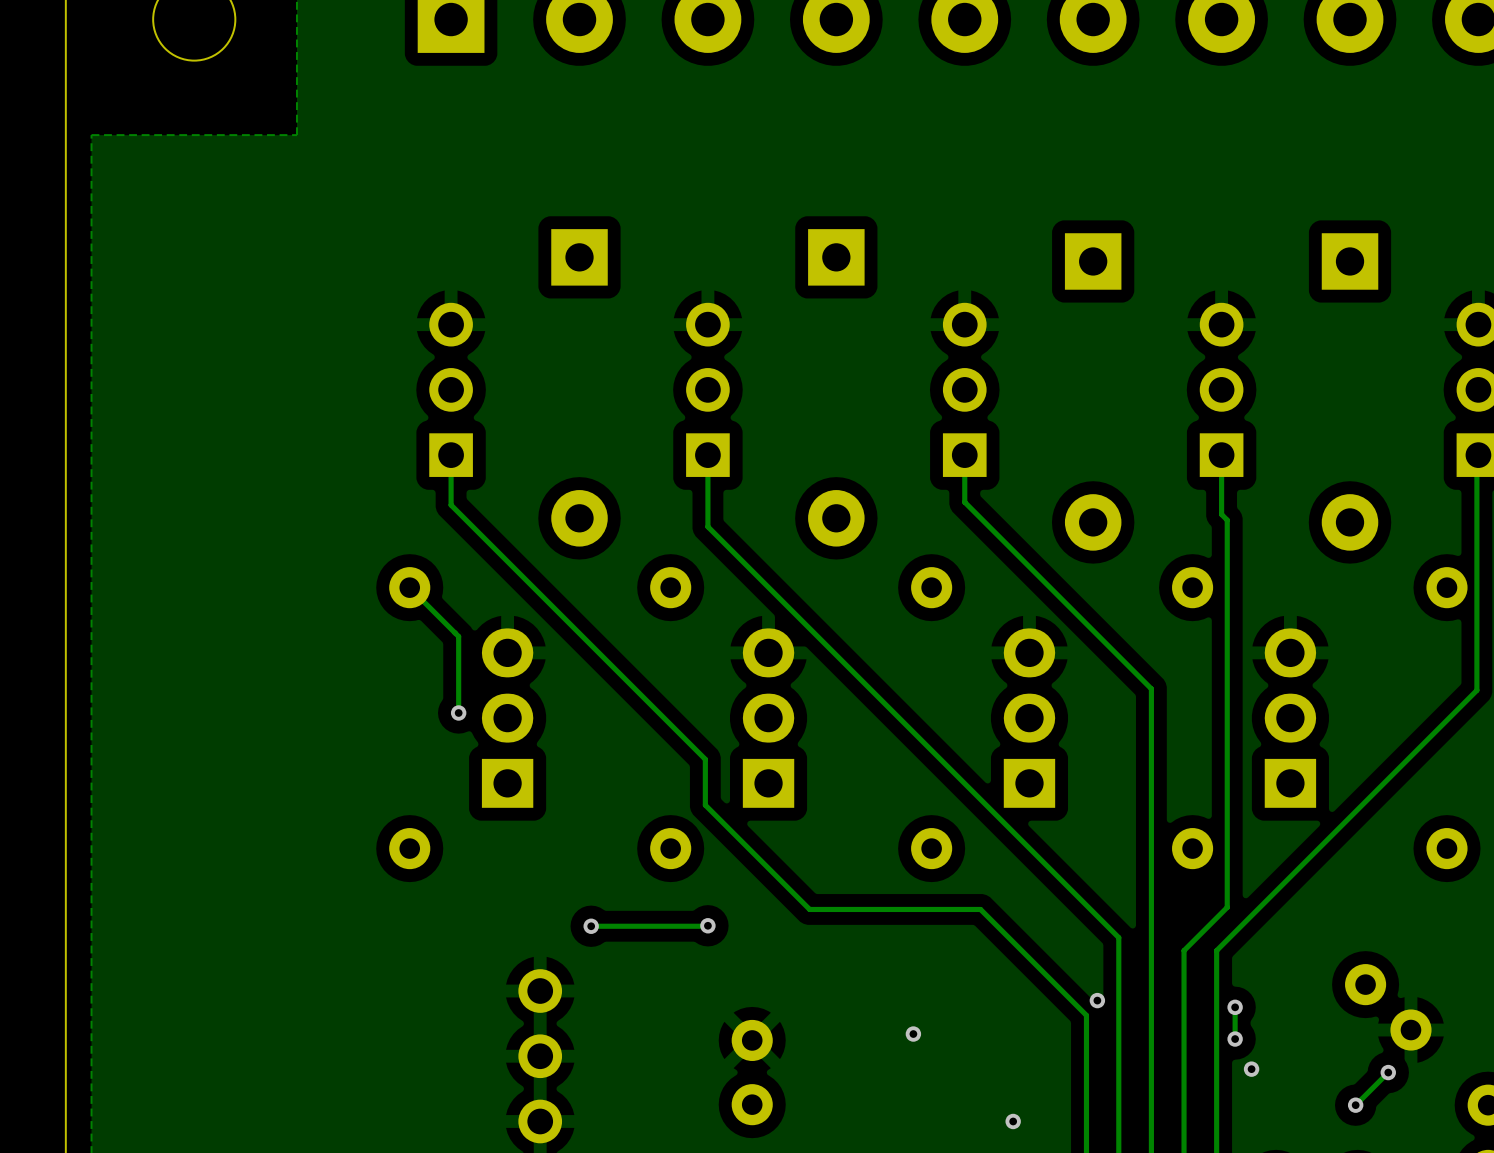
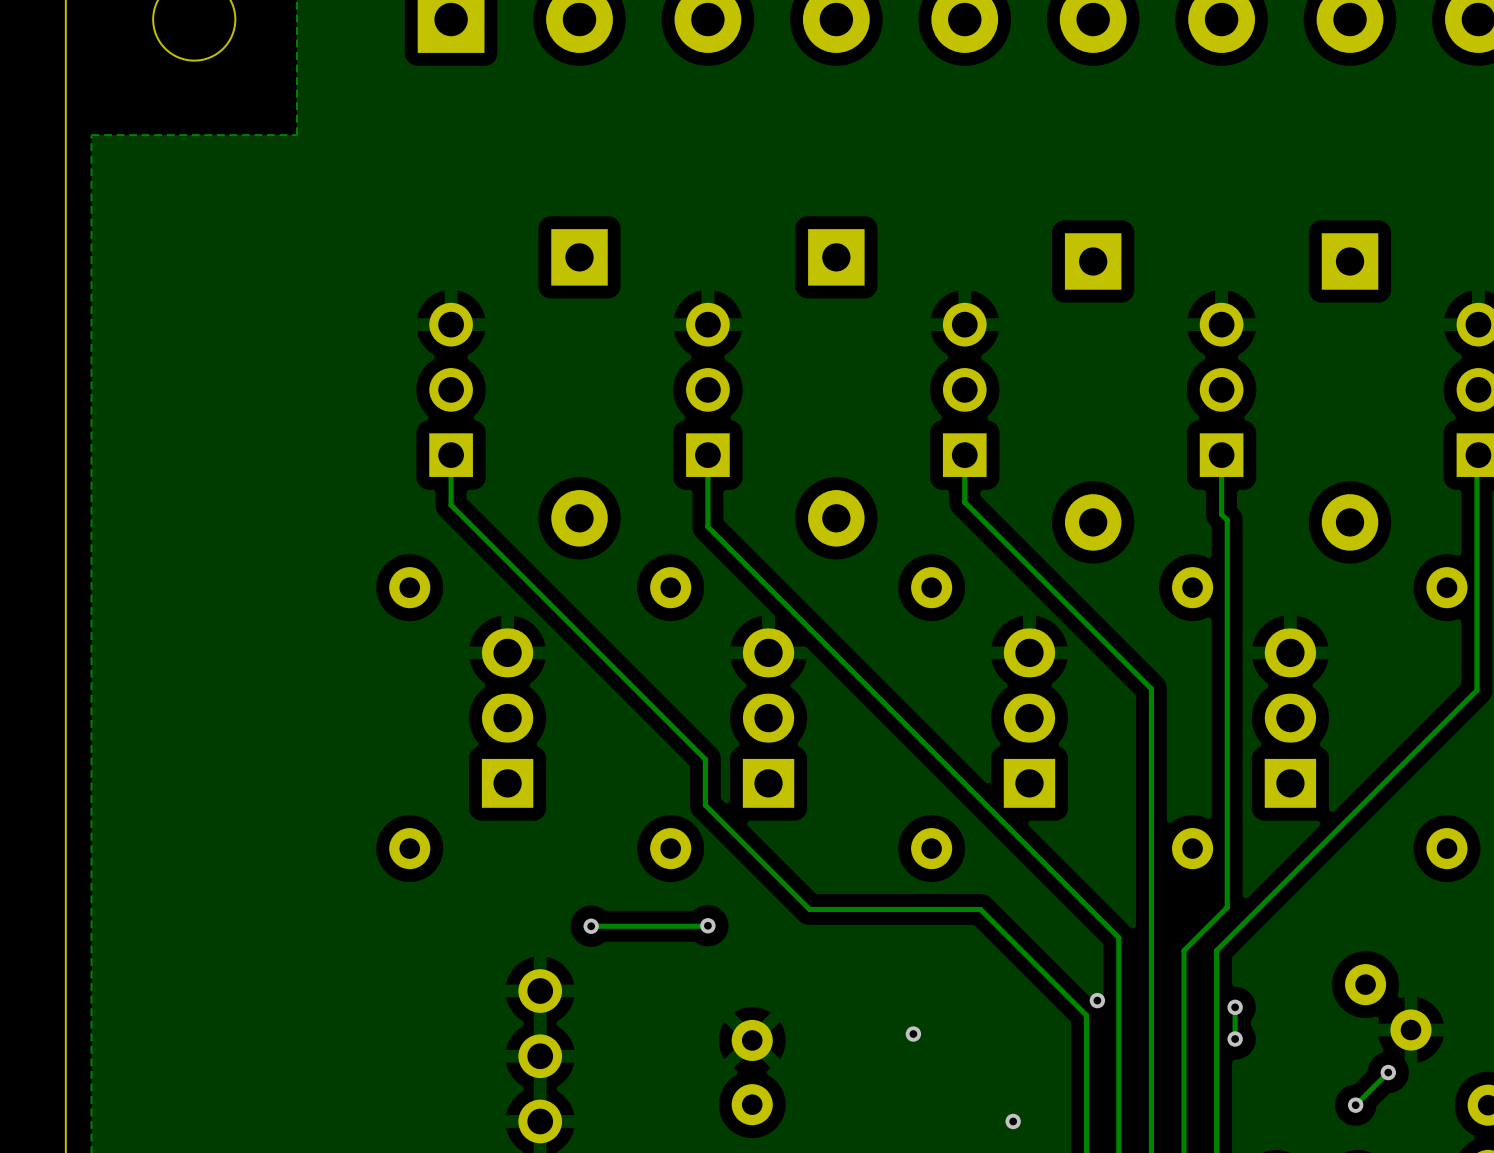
track: (409, 587) (458, 636) (458, 712) -> none
via: (458, 712) -> none
via: (1251, 1069) -> none

